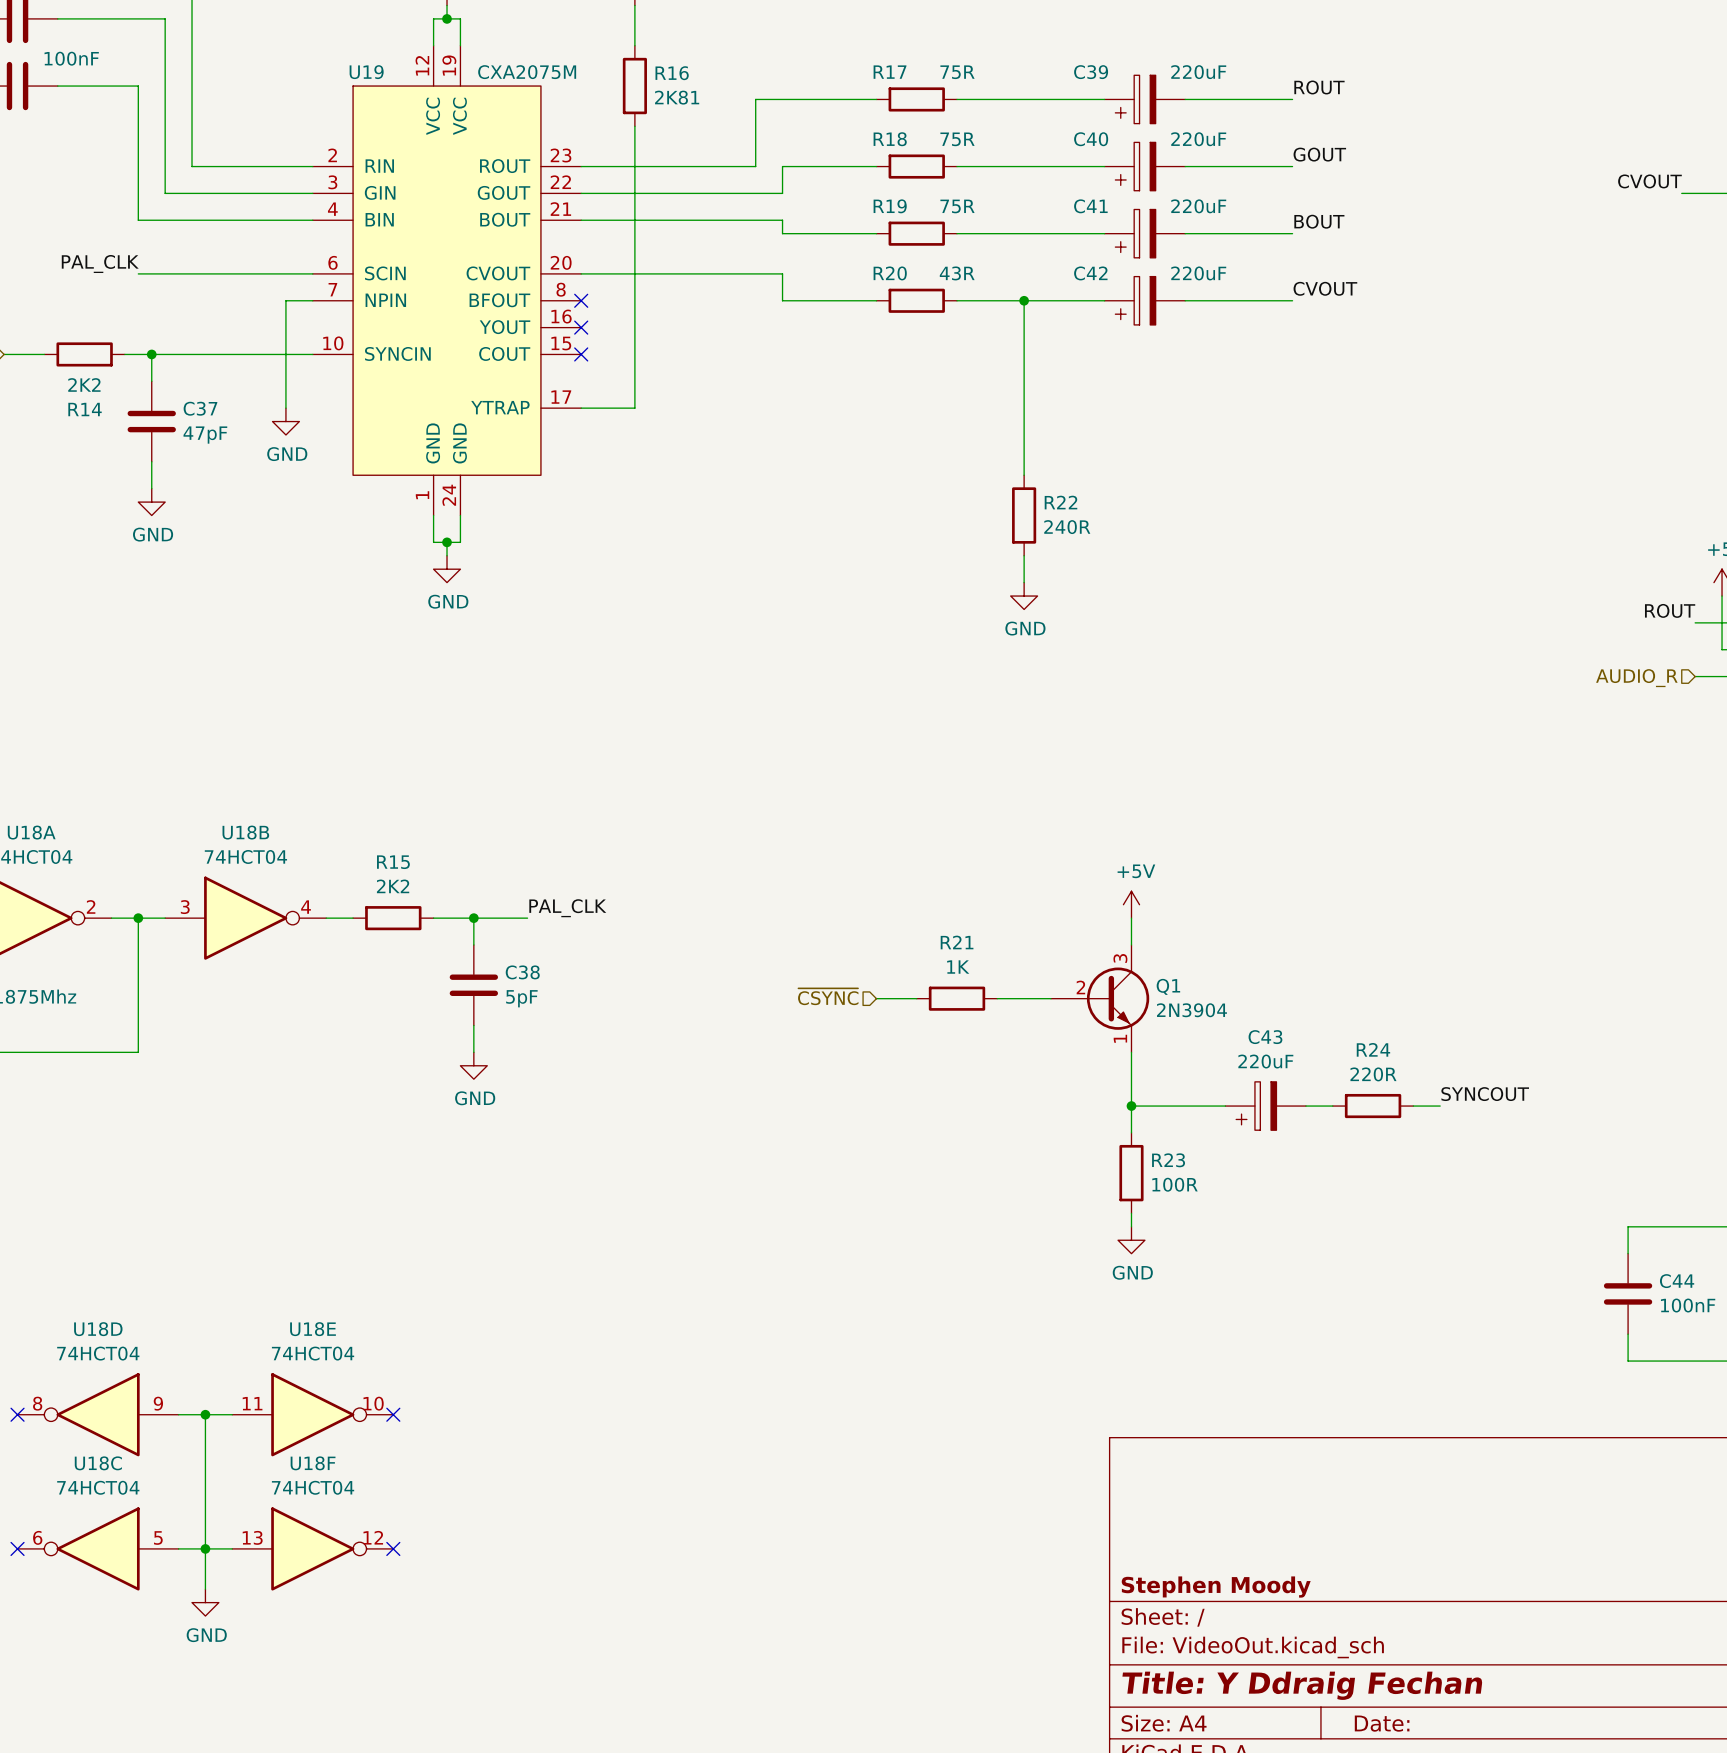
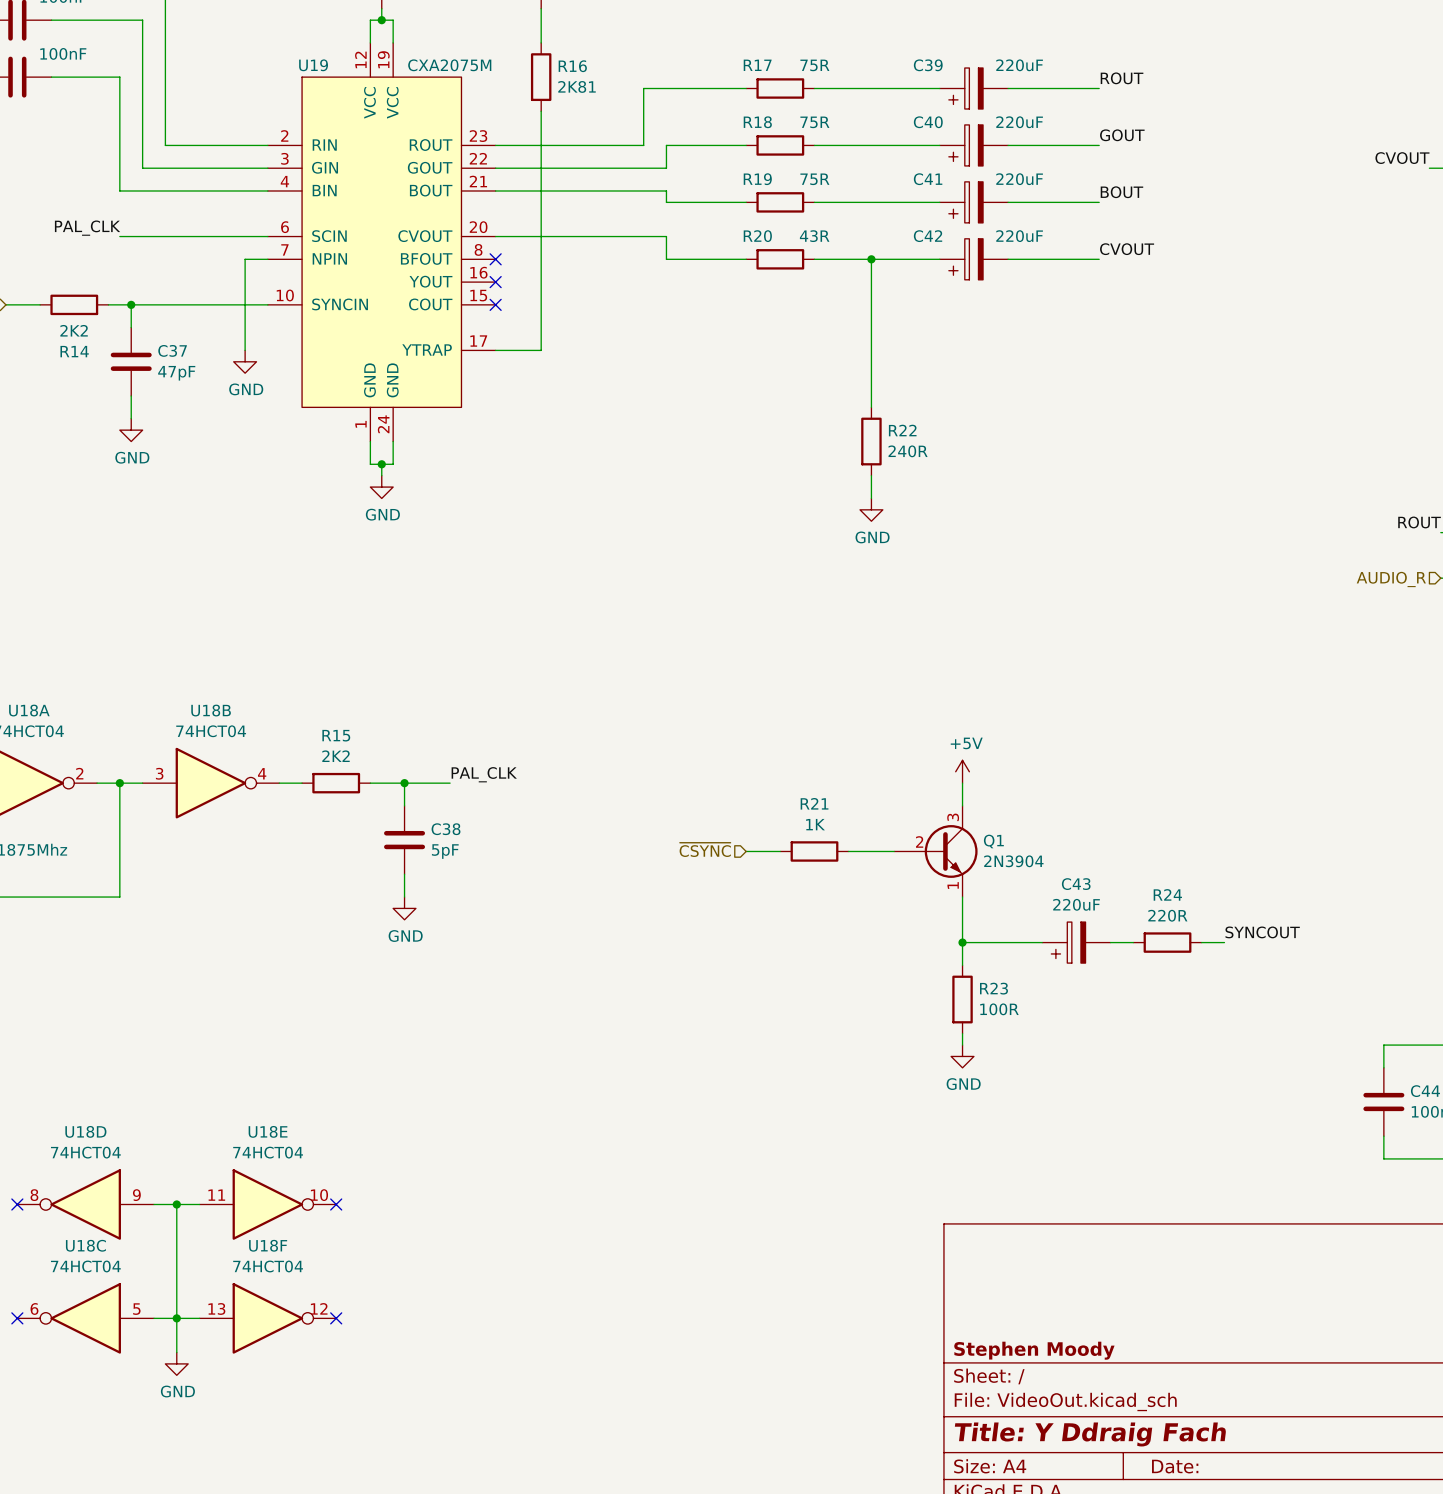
title block: Title: Y Ddraig Fechan (1302, 1685) -> Title: Y Ddraig Fach (1090, 1434)

